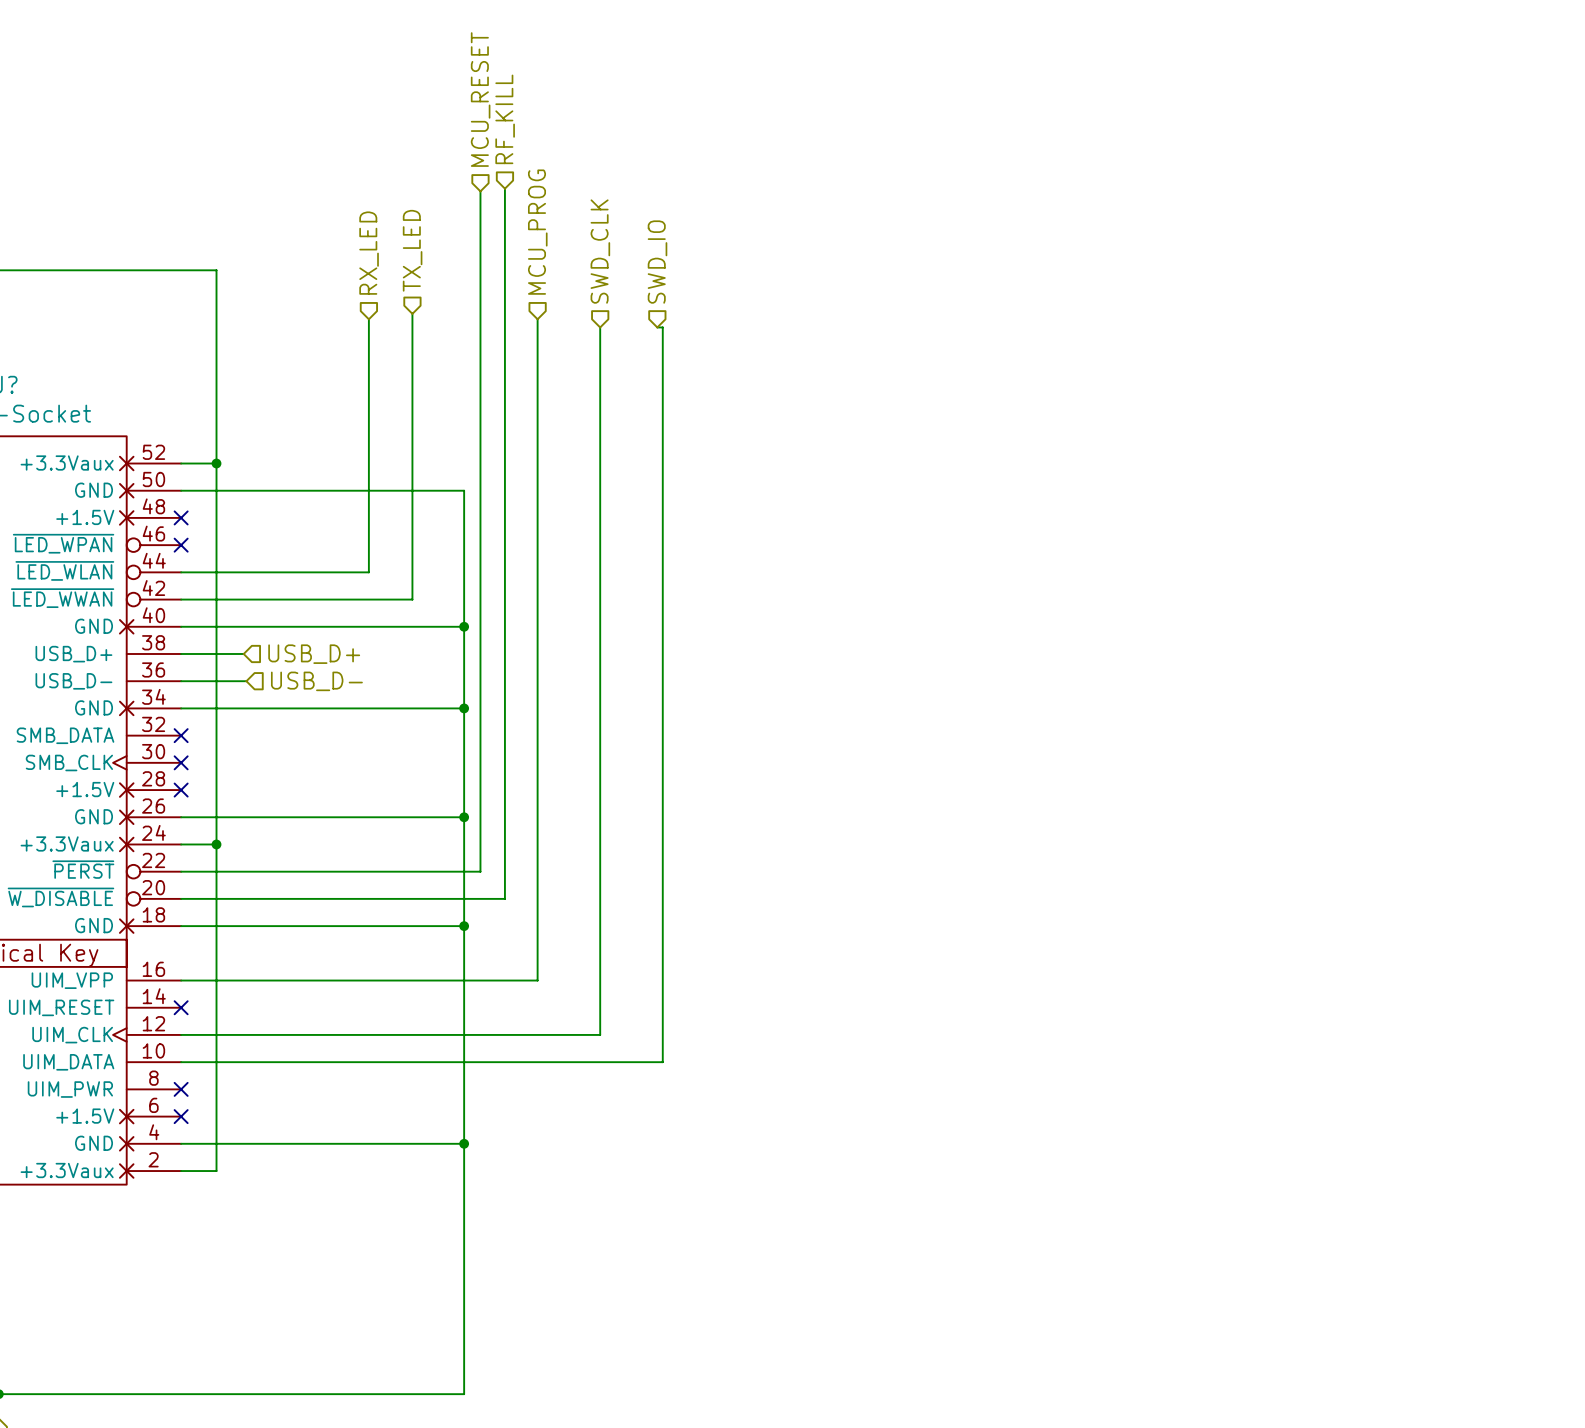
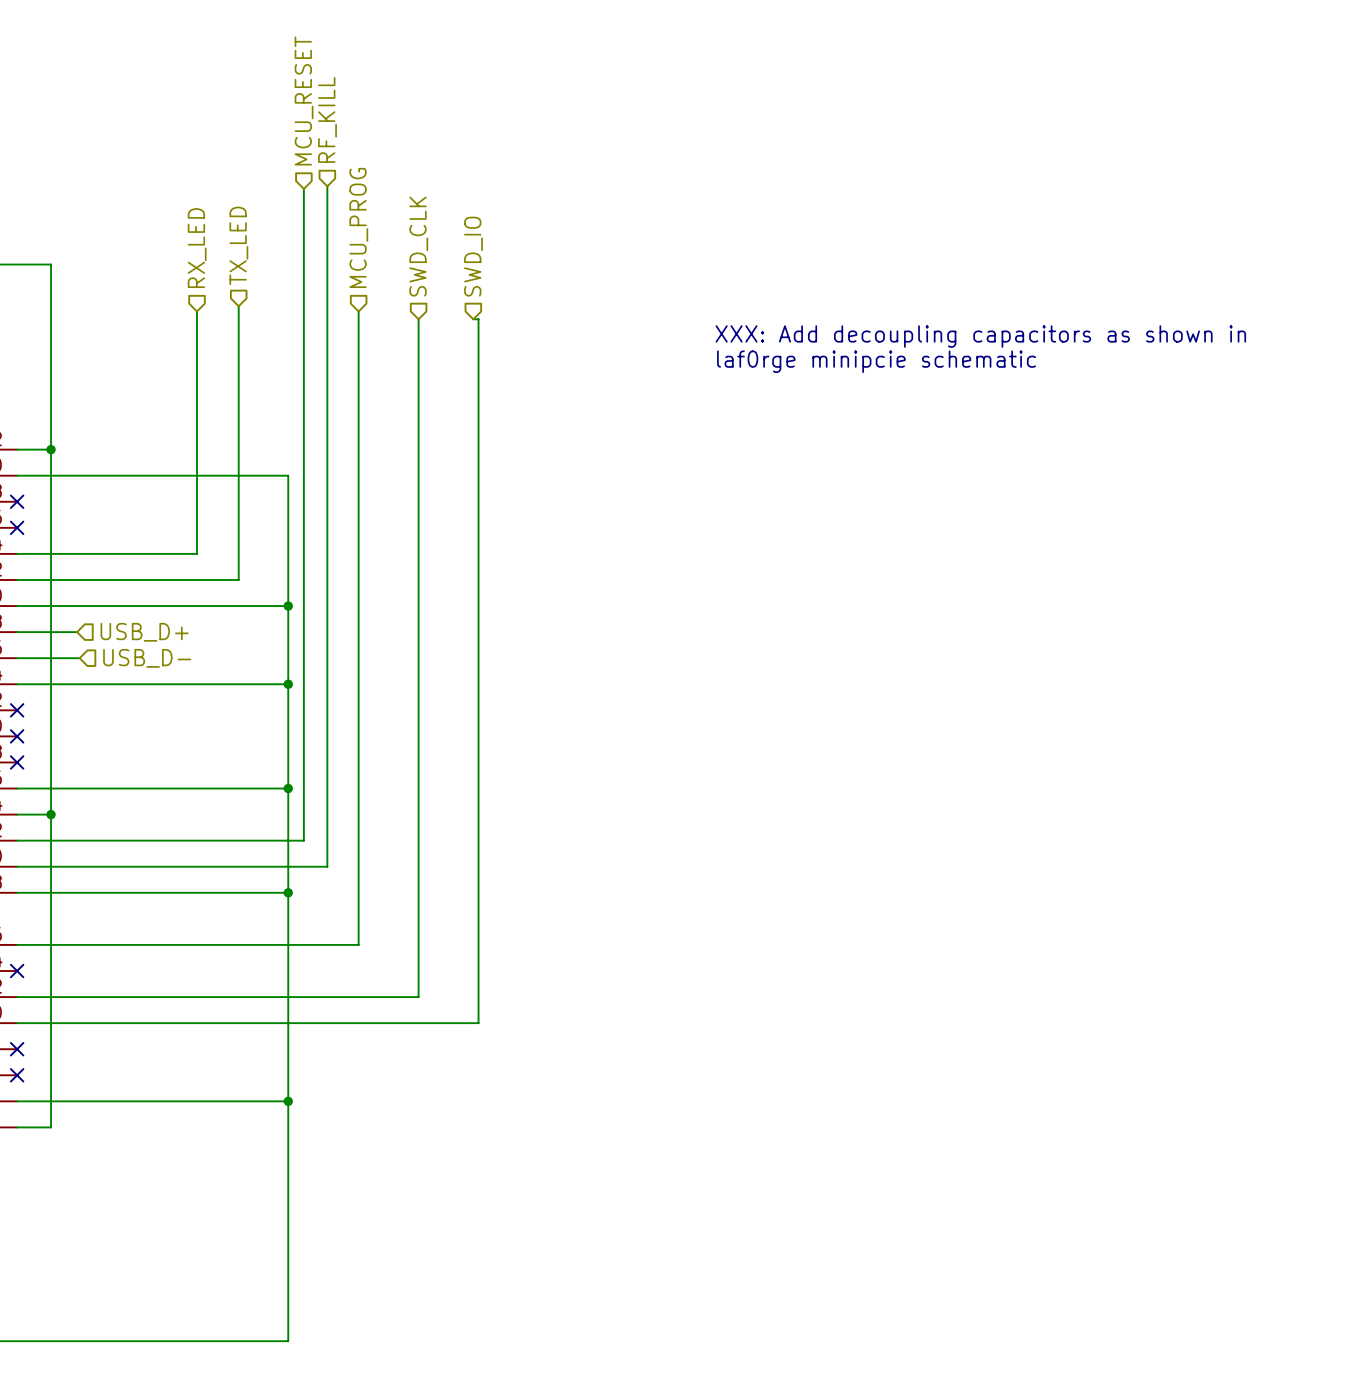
text: none -> XXX: Add decoupling capacitors as shown in (980, 336)
text: none -> laf0rge minipcie schematic (876, 361)

